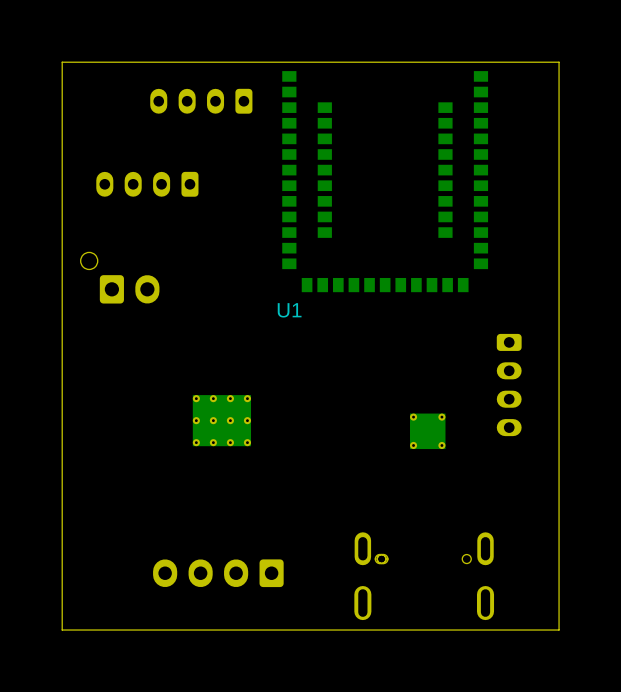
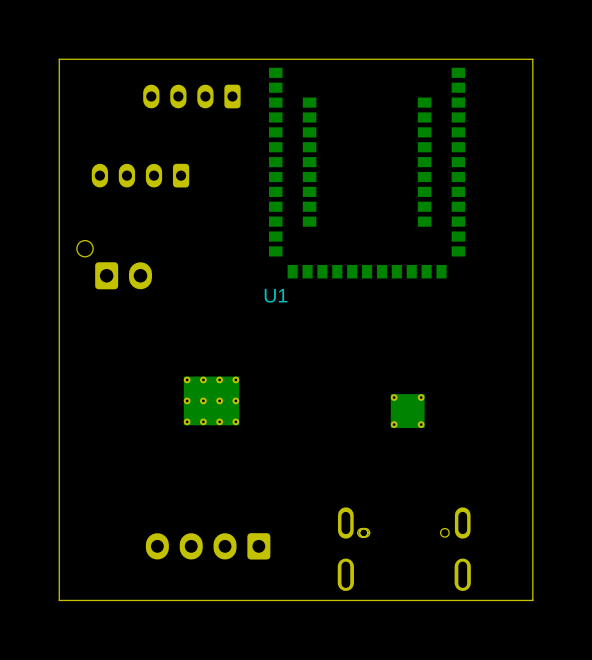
part: (509, 385) -> none

